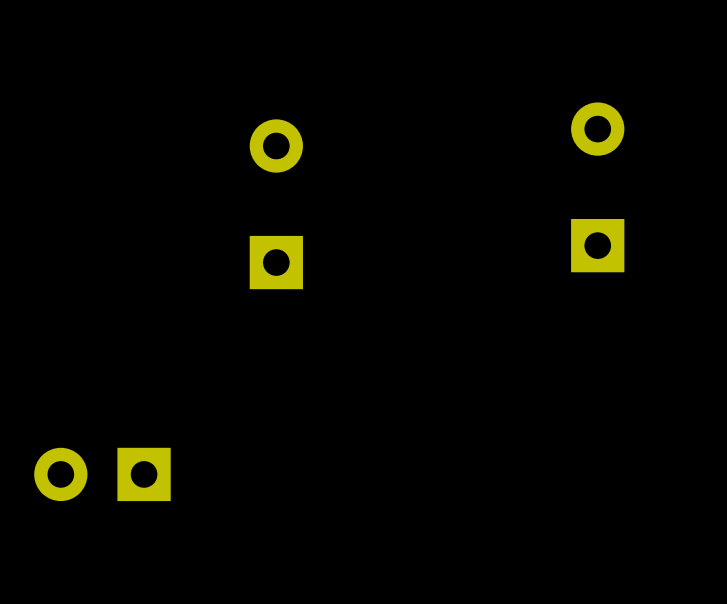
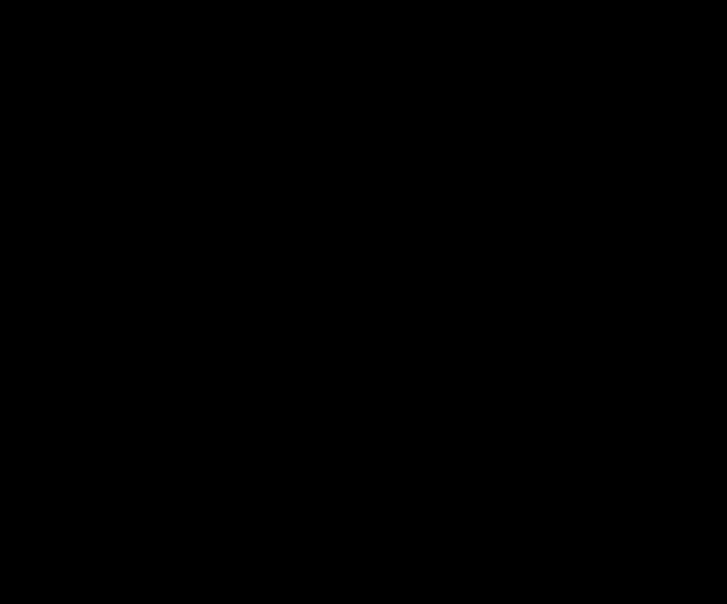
part: (597, 187) -> none
part: (276, 204) -> none
part: (102, 474) -> none

